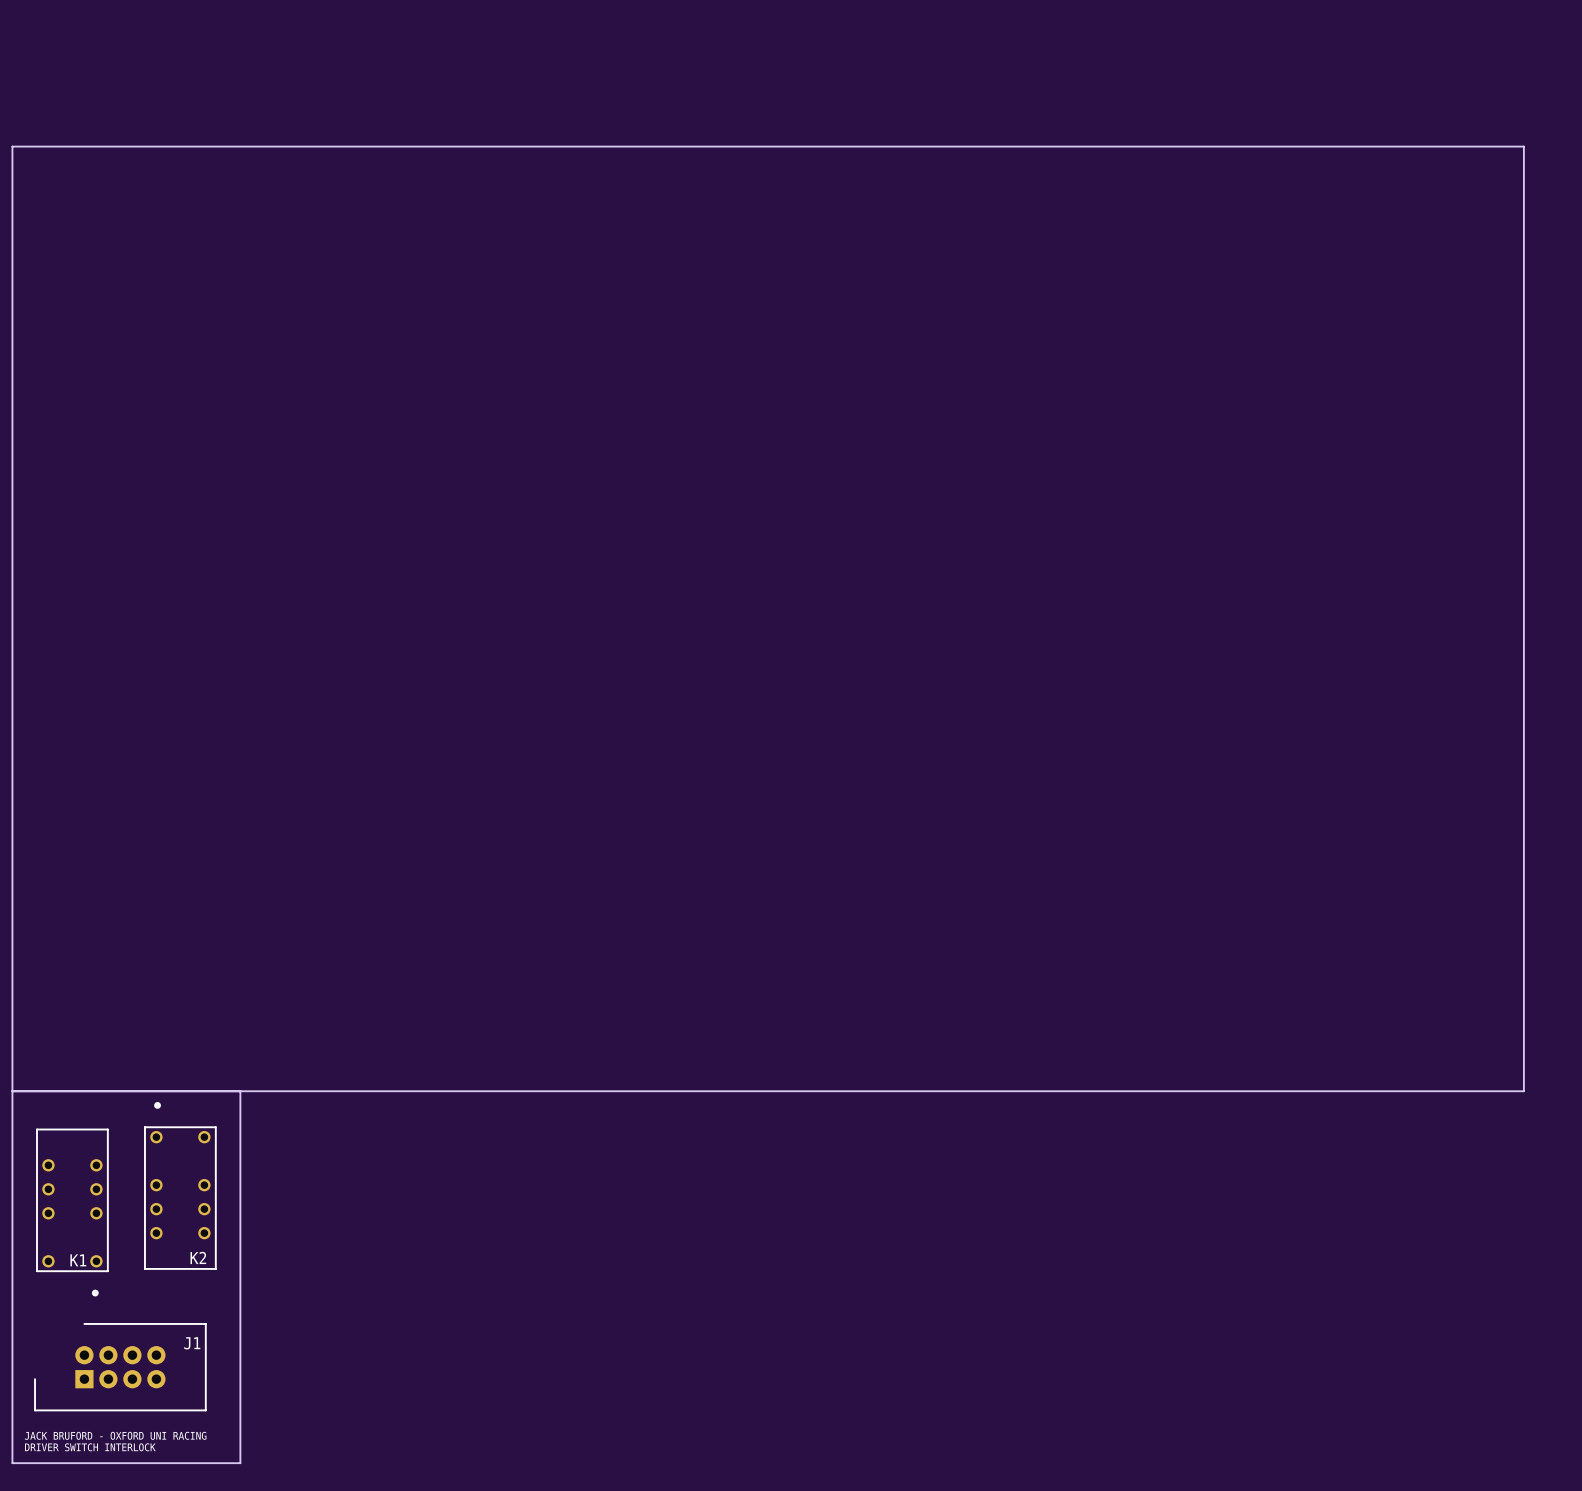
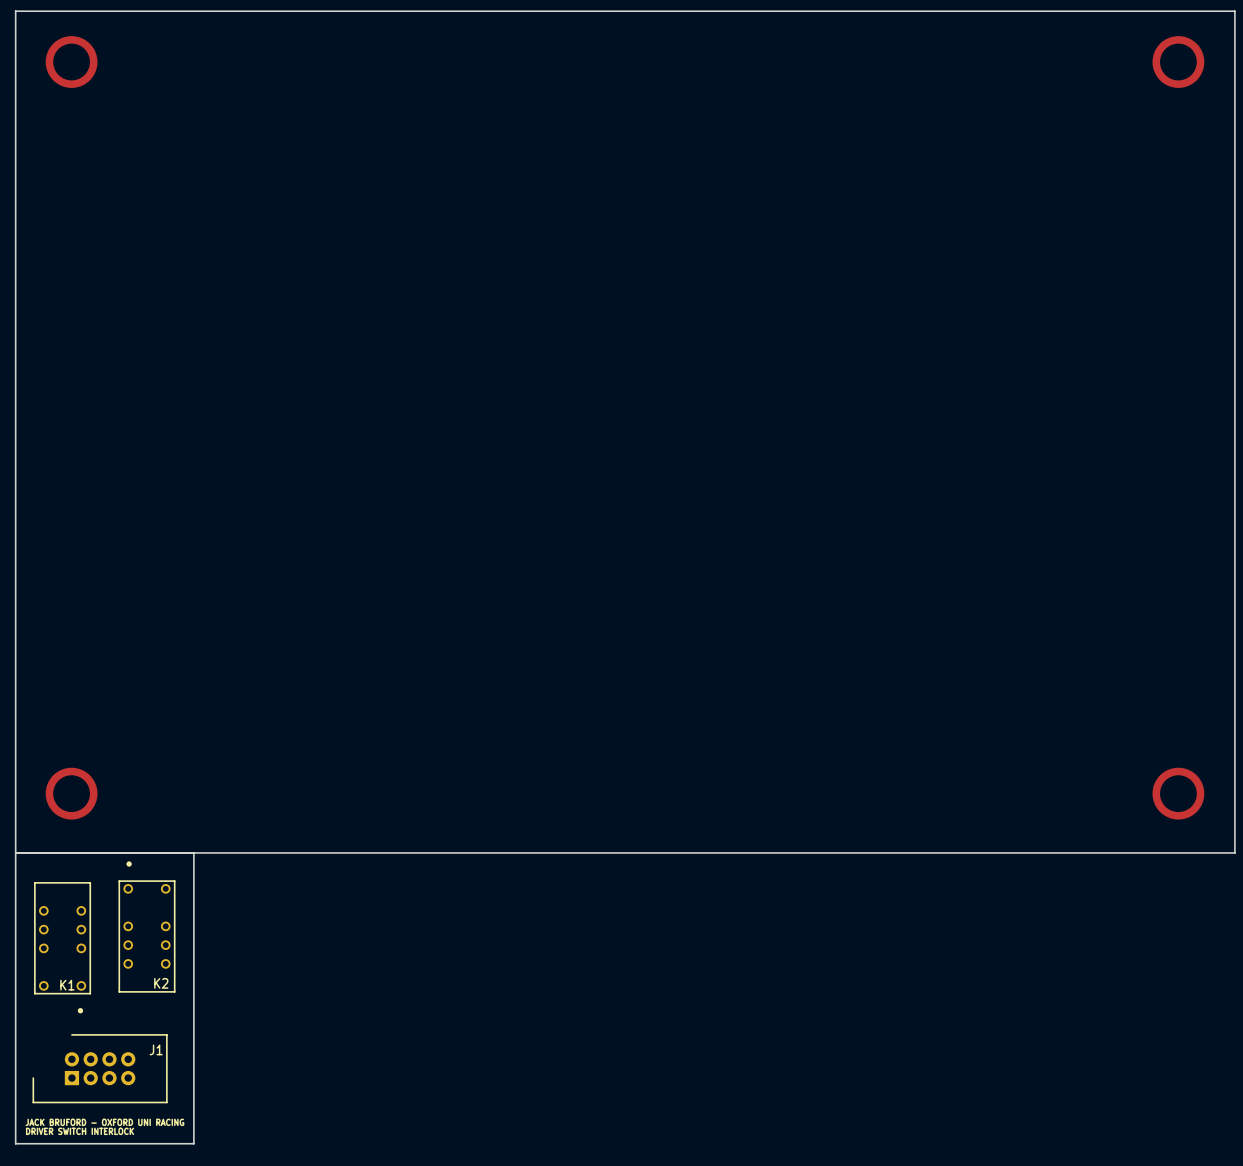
drawing: none -> [45, 36, 98, 88]
drawing: none -> [1152, 36, 1205, 88]
board edge: (12, 146) (1523, 146) (1523, 1091) -> (15, 114) (15, 11) (1234, 11) (1234, 852) (1197, 852)
drawing: none -> [45, 767, 98, 820]
drawing: none -> [1152, 767, 1205, 820]

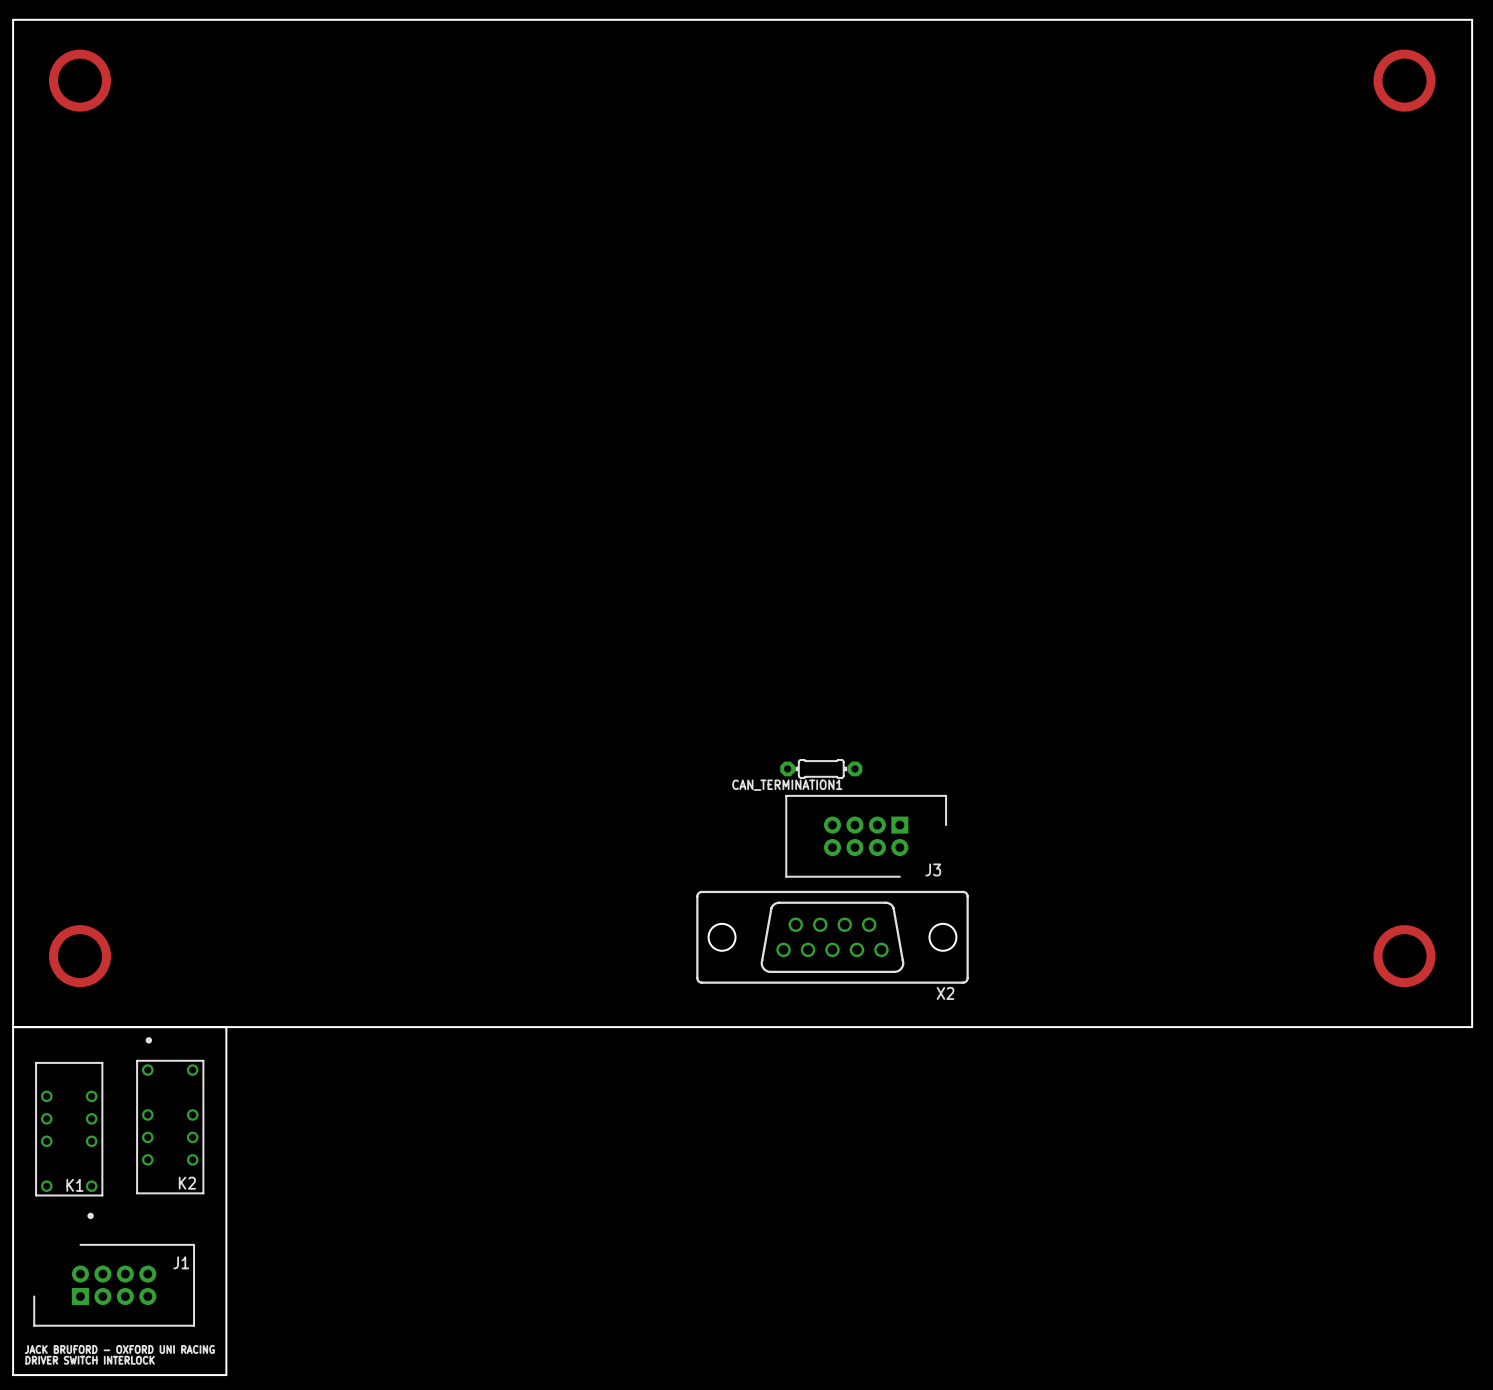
CAN_TERMINATION1: none -> (821, 768)
J3: none -> (866, 836)
X2: none -> (832, 937)

